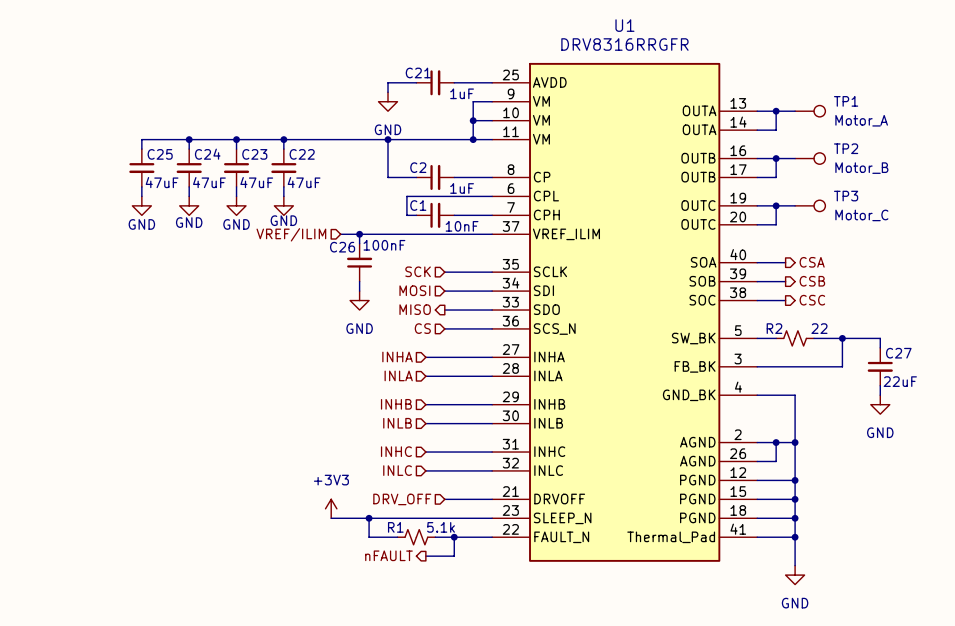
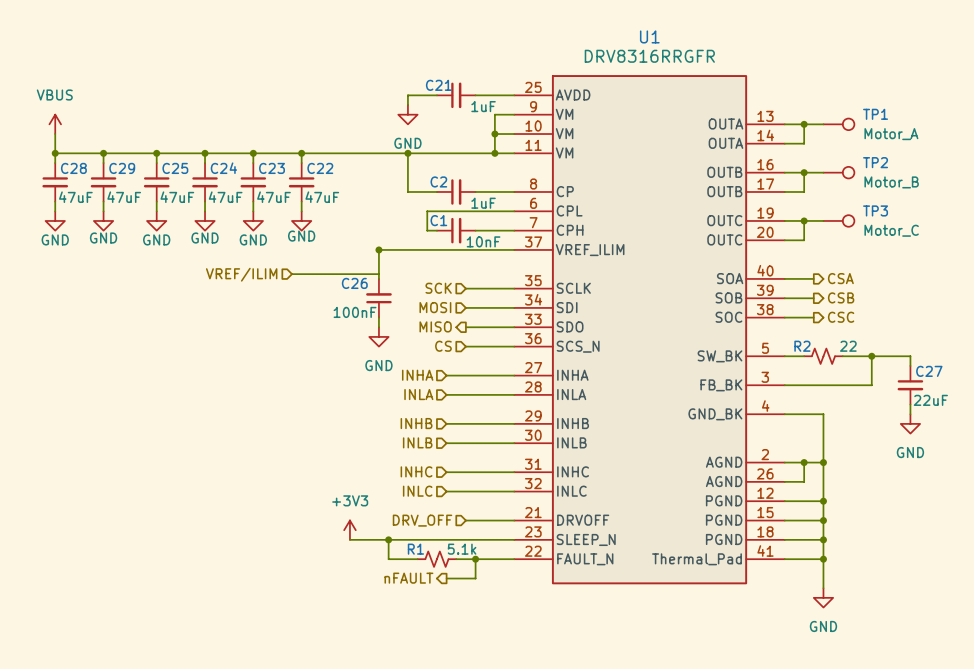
power symbol: none -> VBUS (55, 124)
wire: none -> (55, 134) (55, 163)
wire: none -> (55, 153) (156, 153)
junction: none -> (55, 153)
wire: none -> (103, 153) (103, 163)
junction: none -> (103, 153)
junction: none -> (156, 153)
C28: none -> 47uF (55, 182)
C29: none -> 47uF (103, 182)
wire: none -> (55, 201) (55, 211)
wire: none -> (103, 201) (103, 211)
power symbol: none -> GND (55, 220)
power symbol: none -> GND (103, 220)
hierarchical label position: VREF/ILIM (291, 234) -> VREF/ILIM (241, 274)
wire: (340, 234) (359, 234) -> none
C26 value position: 100nF (384, 245) -> 100nF (355, 312)
C26 name position: C26 (342, 247) -> C26 (354, 283)
wire: none -> (291, 274) (378, 274)
C26 position: (359, 262) -> (378, 298)
power symbol position: GND (359, 300) -> GND (378, 336)

